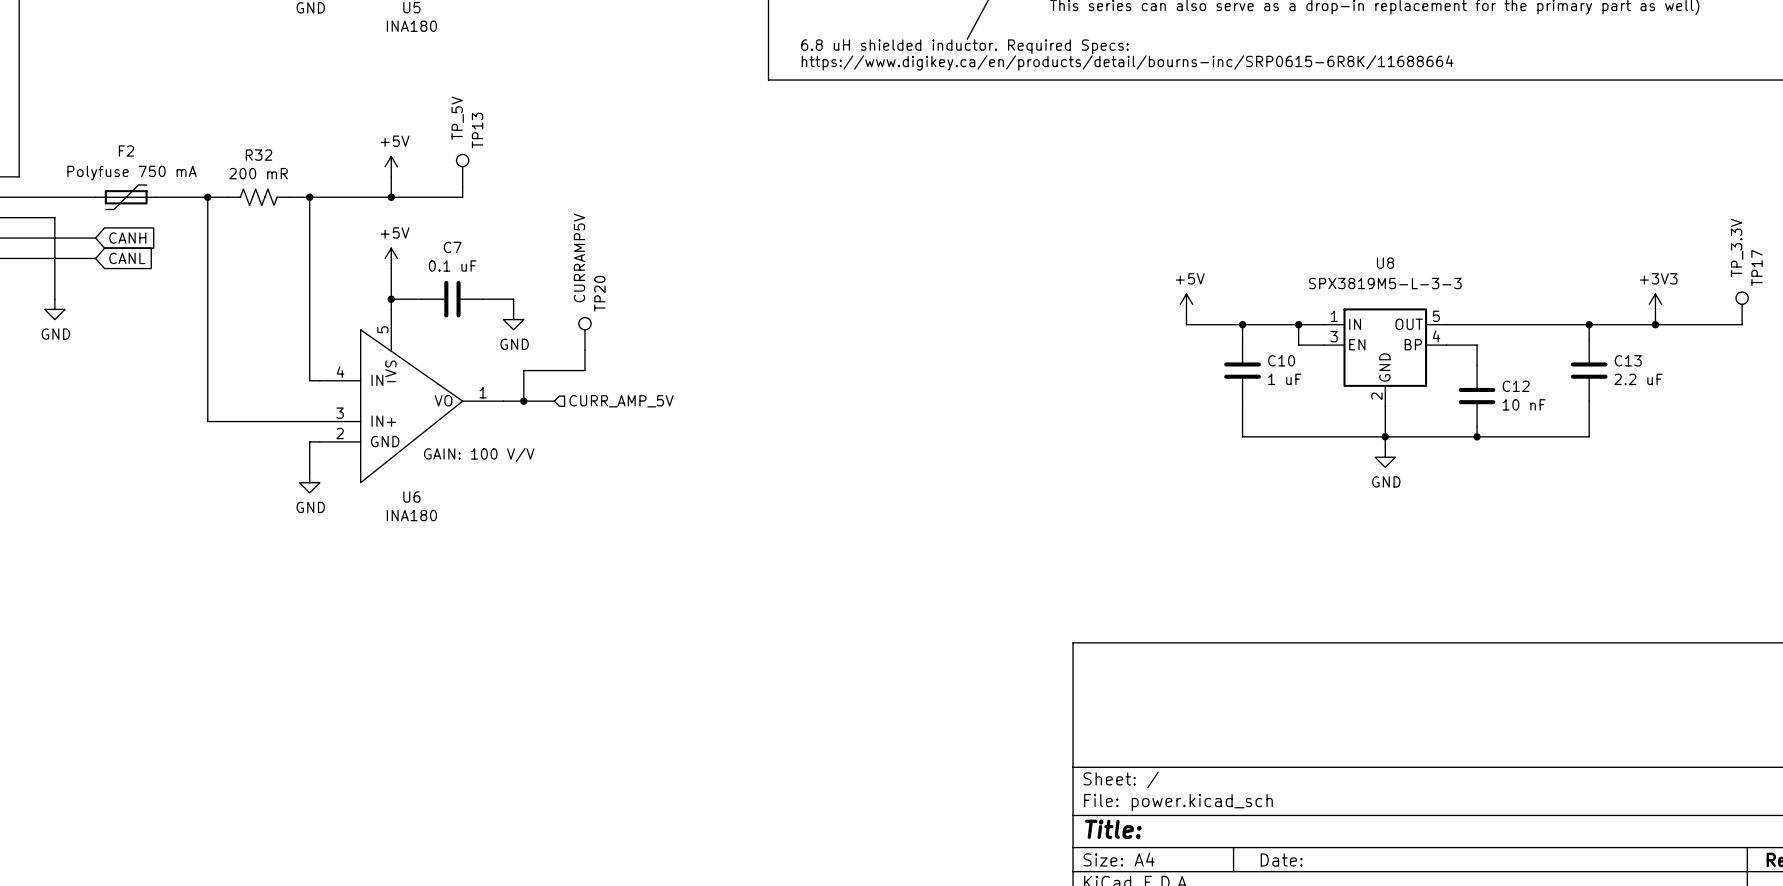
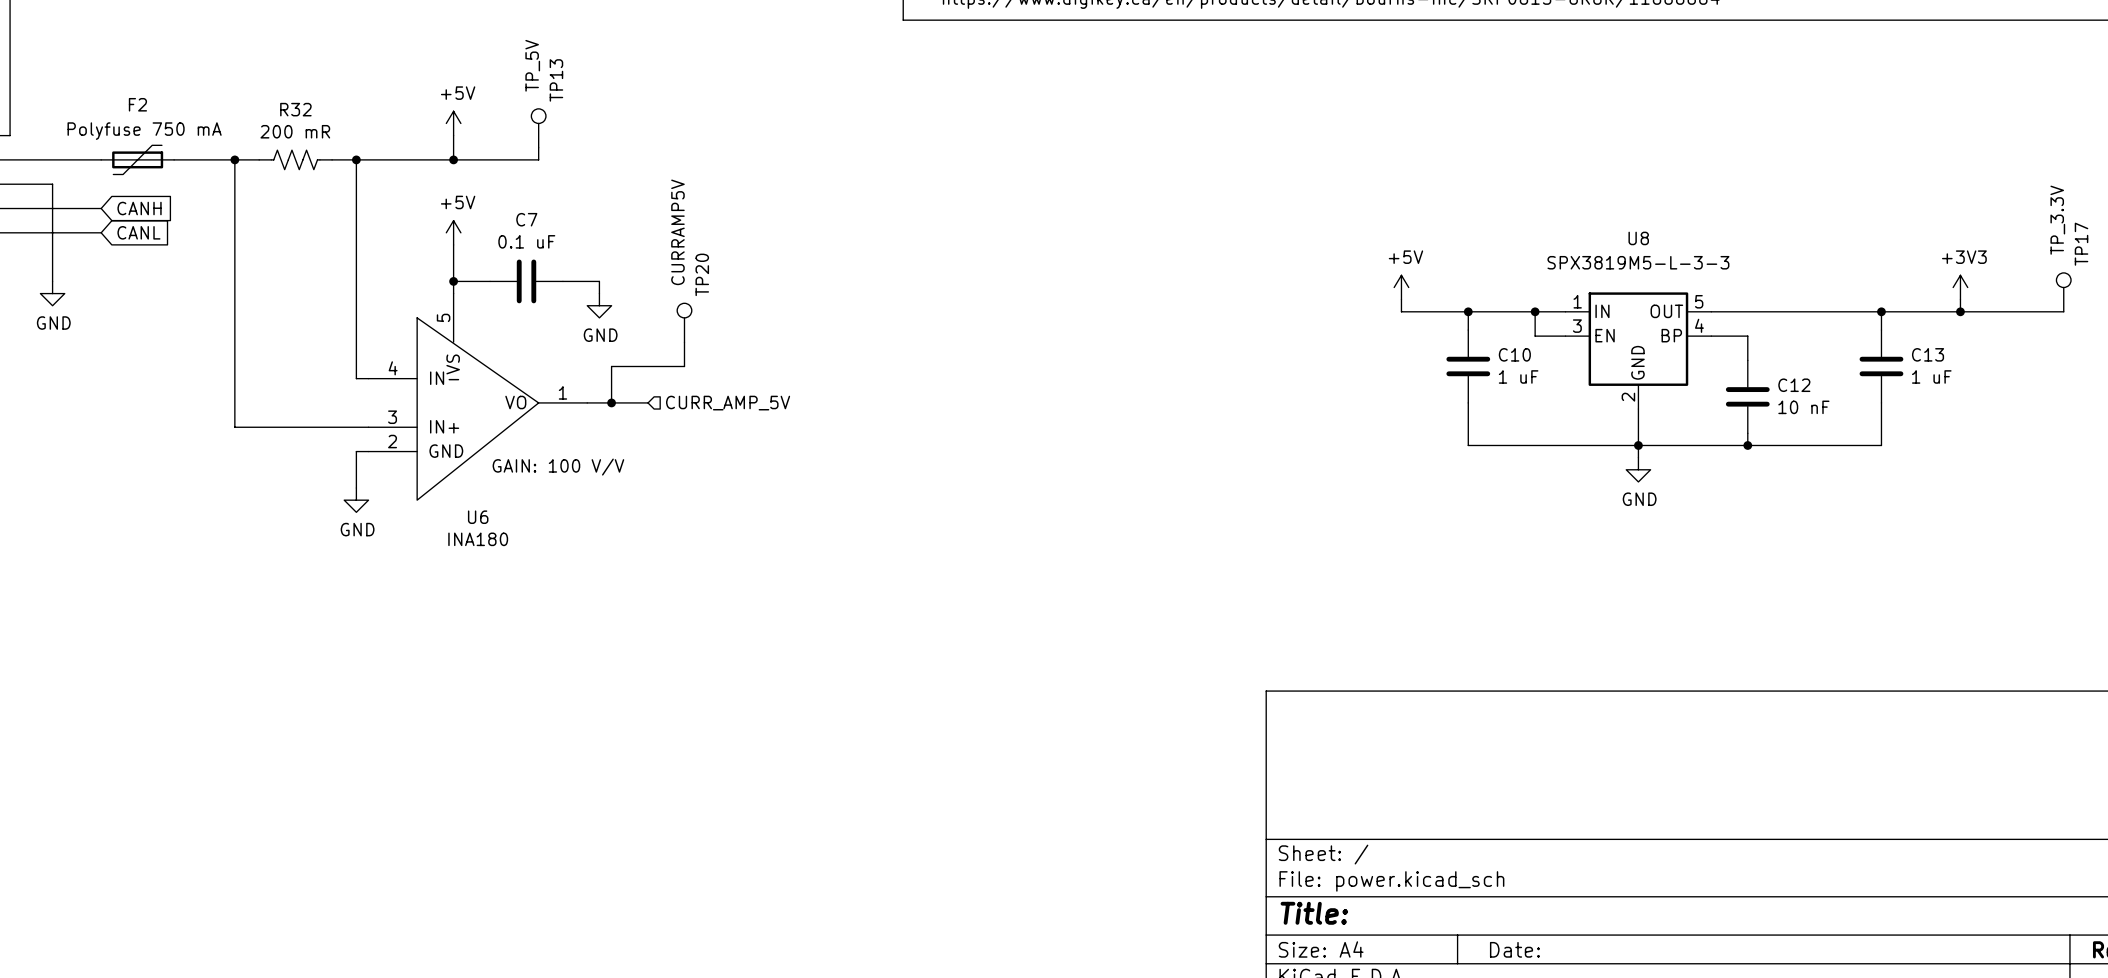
C13 value: 2.2 uF (1638, 379) -> 1 uF (1931, 376)

